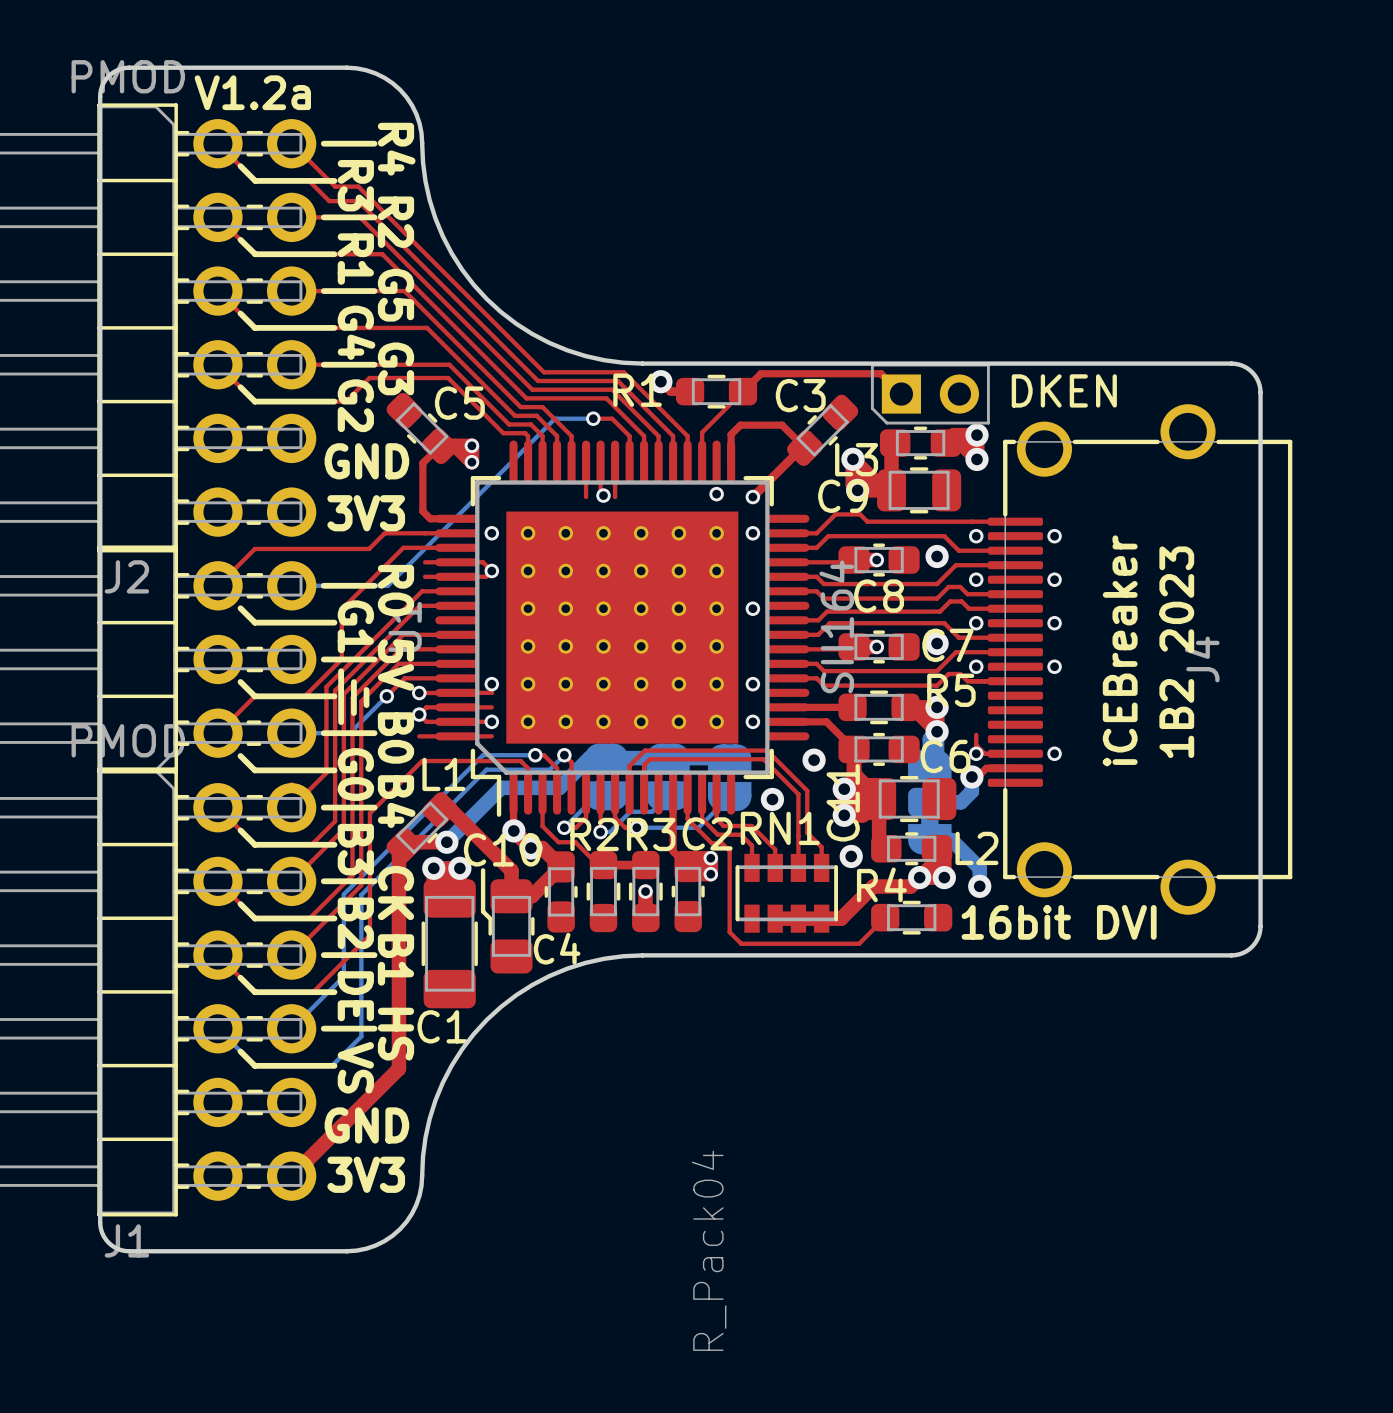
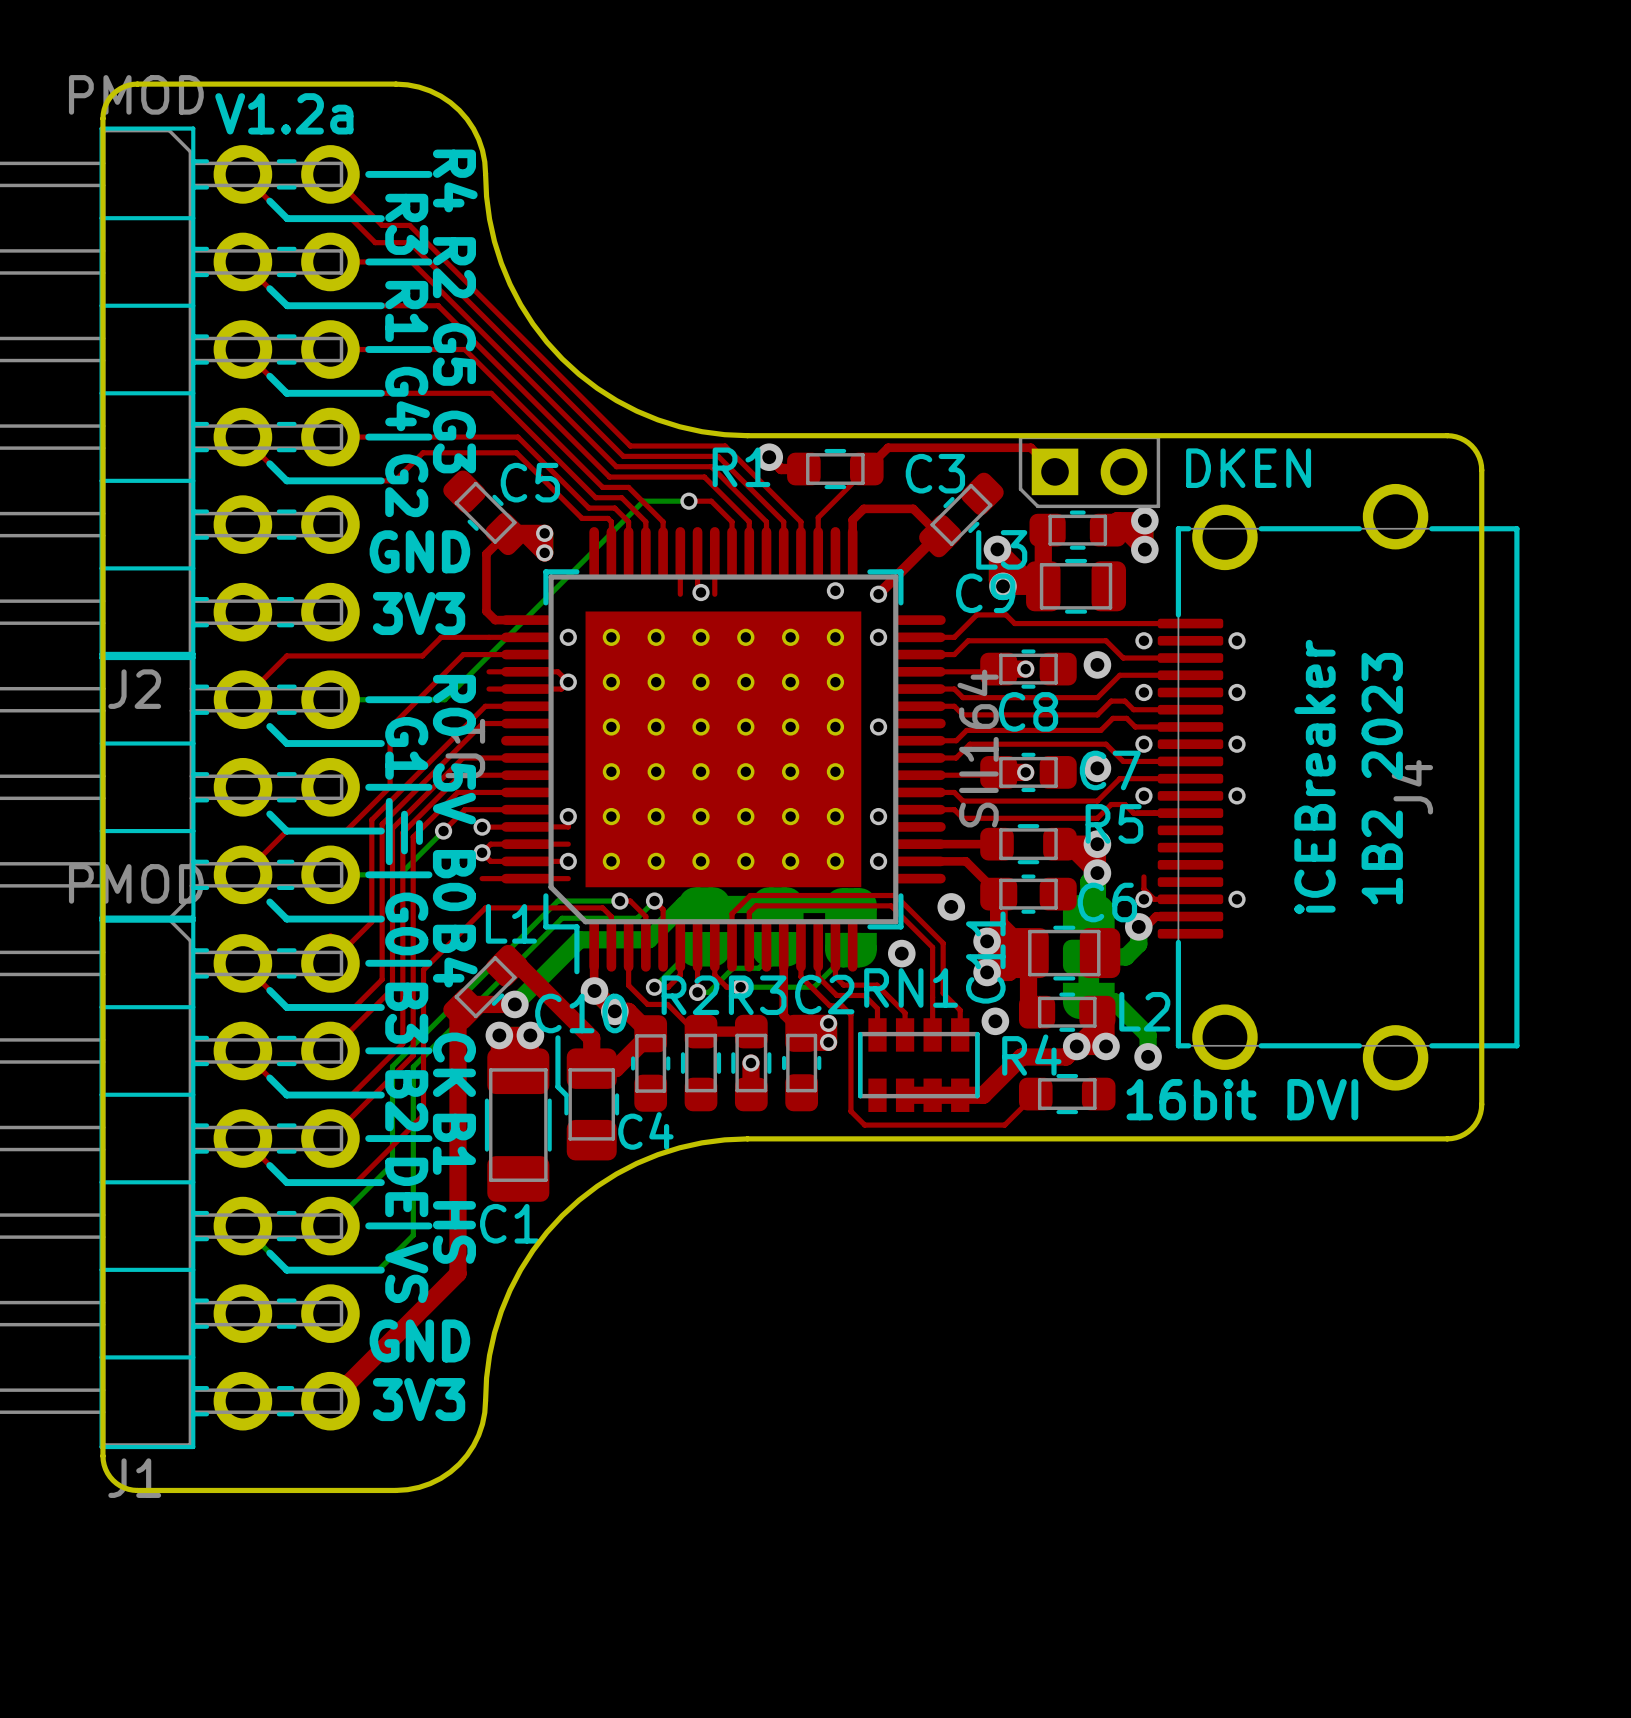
RN1 value: R_Pack04 (709, 1250) -> none

